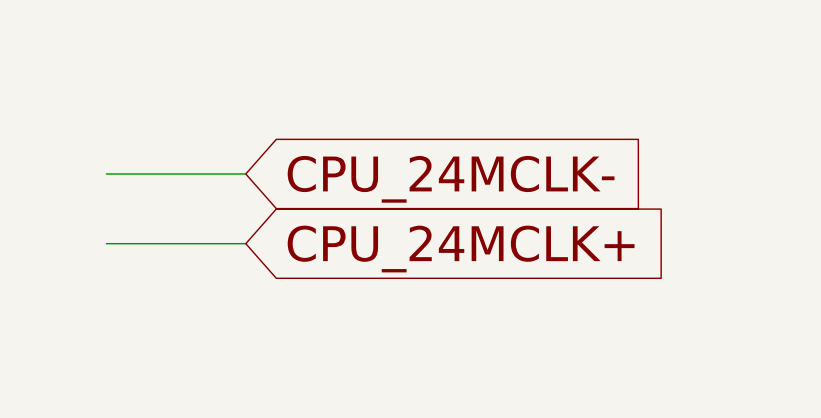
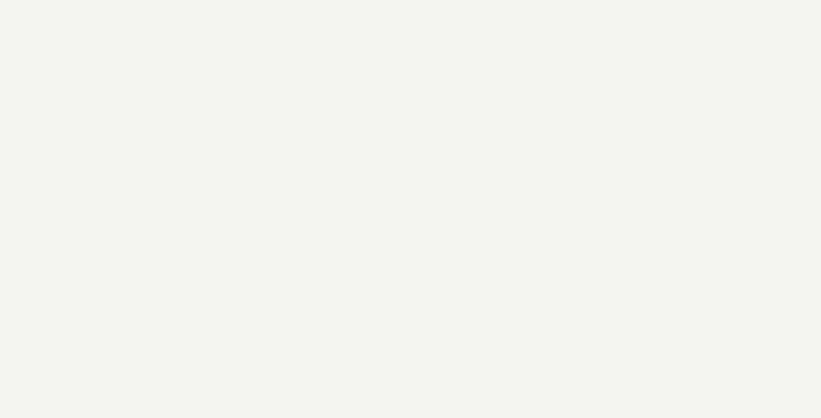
wire: (106, 173) (245, 173) -> none
global label: CPU_24MCLK- (451, 179) -> none
wire: (106, 243) (245, 243) -> none
global label: CPU_24MCLK+ (461, 249) -> none

